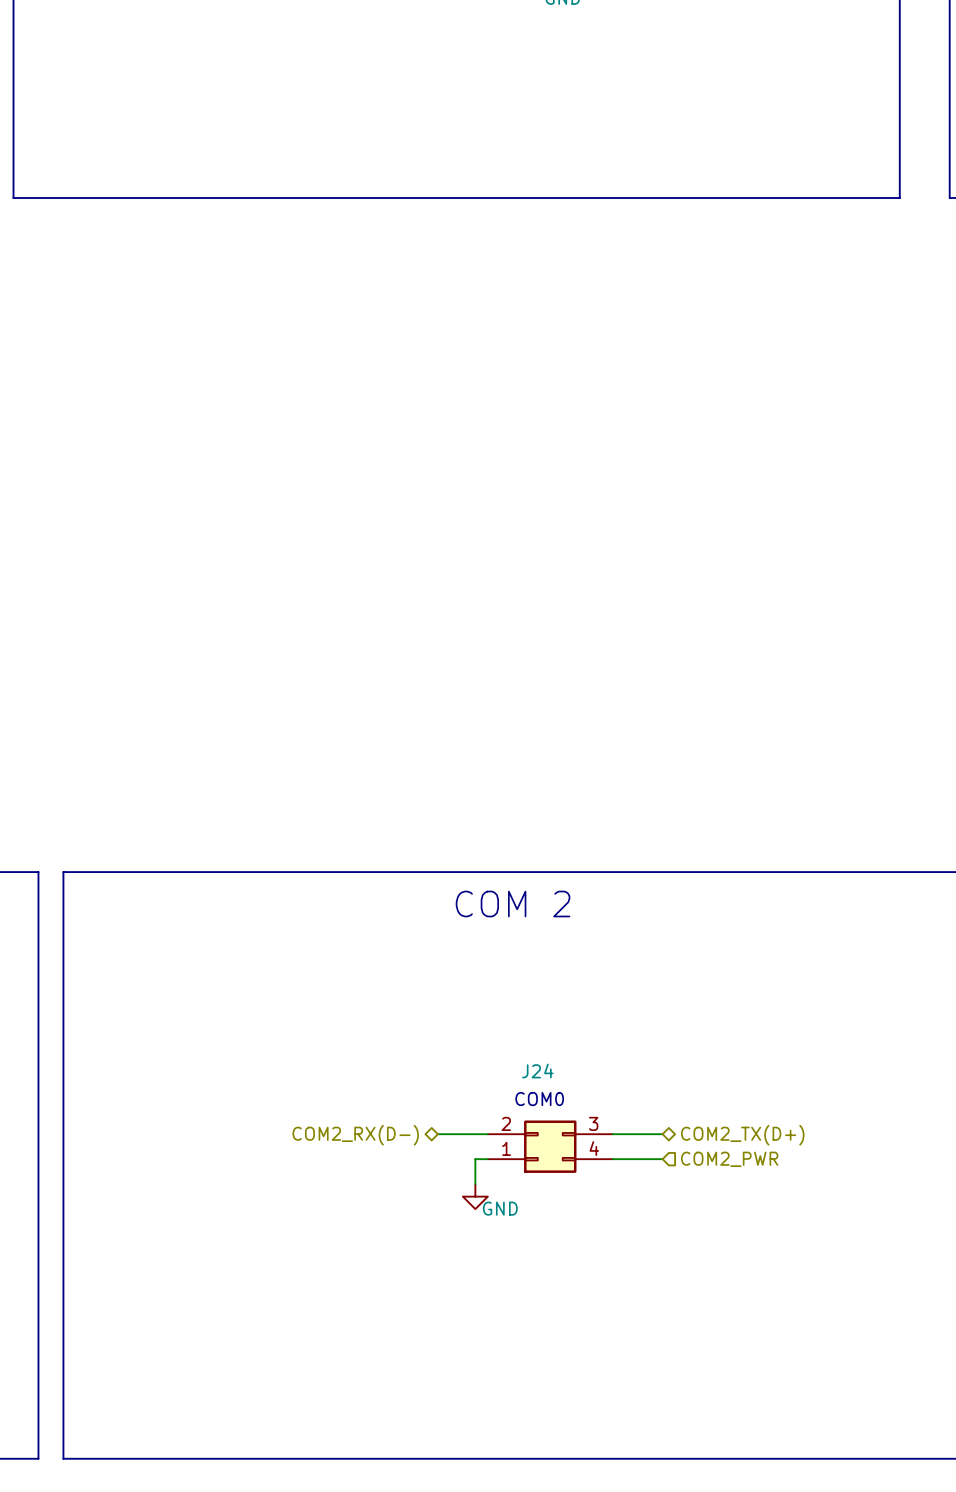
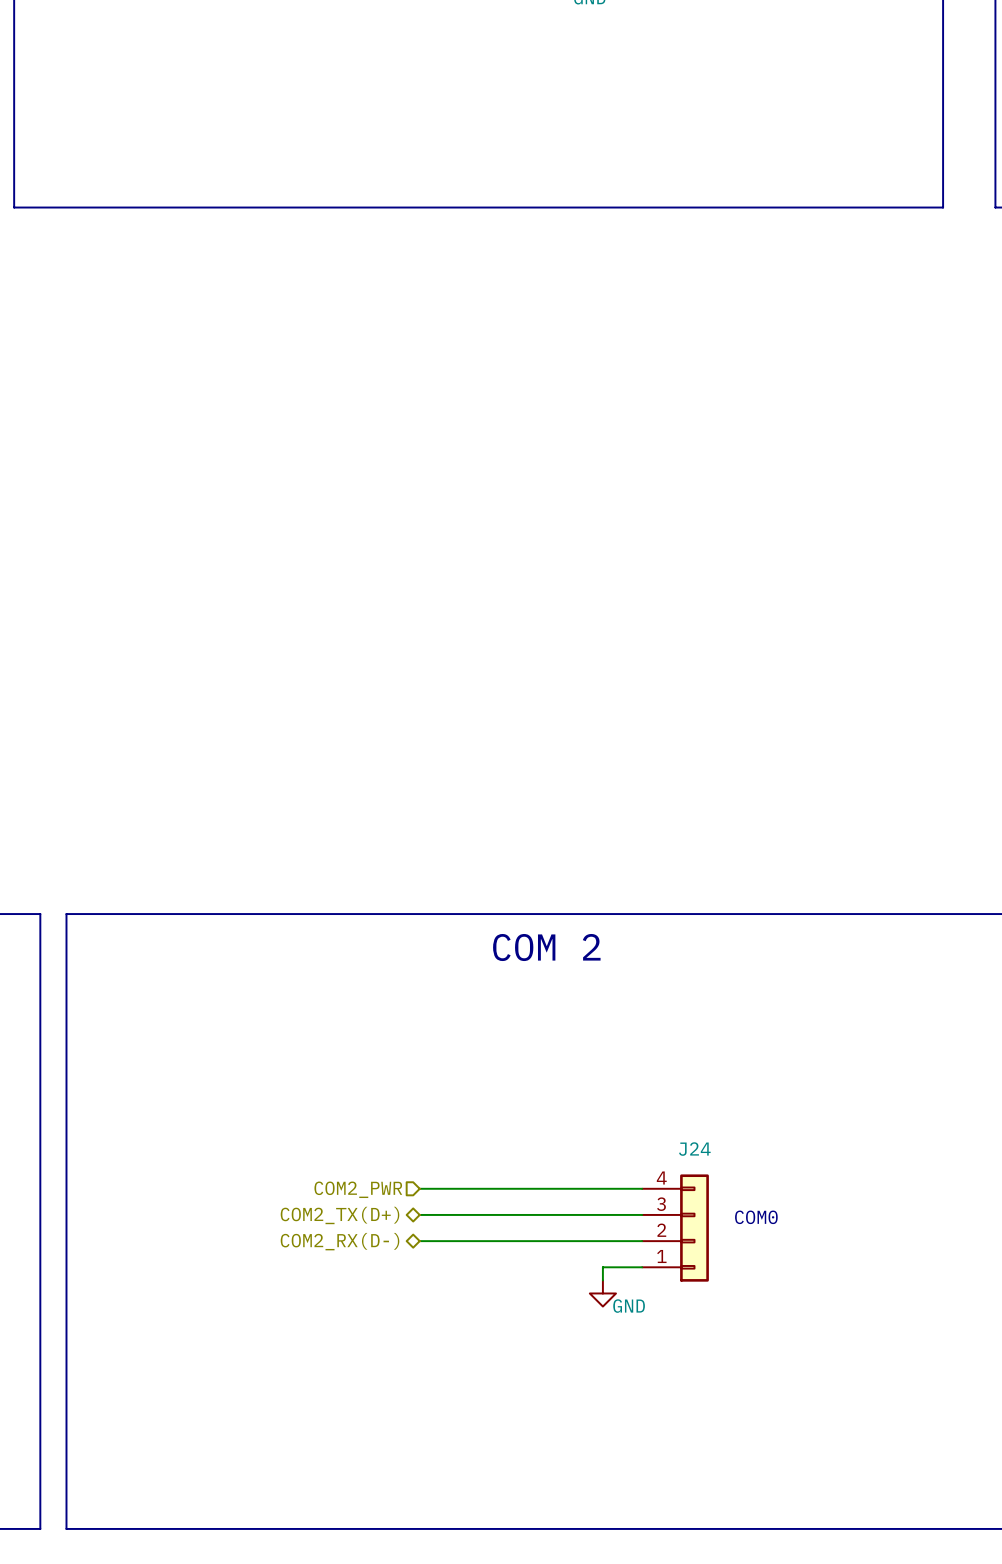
J24 name position: J24 (537, 1071) -> J24 (694, 1149)
text position: COM0 (539, 1099) -> COM0 (756, 1217)
J24 symbol: [487, 1120, 613, 1173] -> [642, 1174, 709, 1282]
hierarchical label: none -> COM2_PWR (358, 1189)
wire: none -> (419, 1188) (458, 1188)
hierarchical label position: COM2_RX(D-) (355, 1135) -> COM2_RX(D-) (340, 1241)
hierarchical label: COM2_TX(D+) (742, 1135) -> none
wire: (475, 1159) (475, 1184) -> (498, 1214) (419, 1214)
hierarchical label: COM2_PWR (729, 1159) -> none
hierarchical label: none -> COM2_TX(D+) (340, 1215)
wire: none -> (419, 1241) (642, 1241)
power symbol position: GND (475, 1196) -> GND (602, 1293)
wire: none -> (642, 1267) (602, 1267) (602, 1280)

